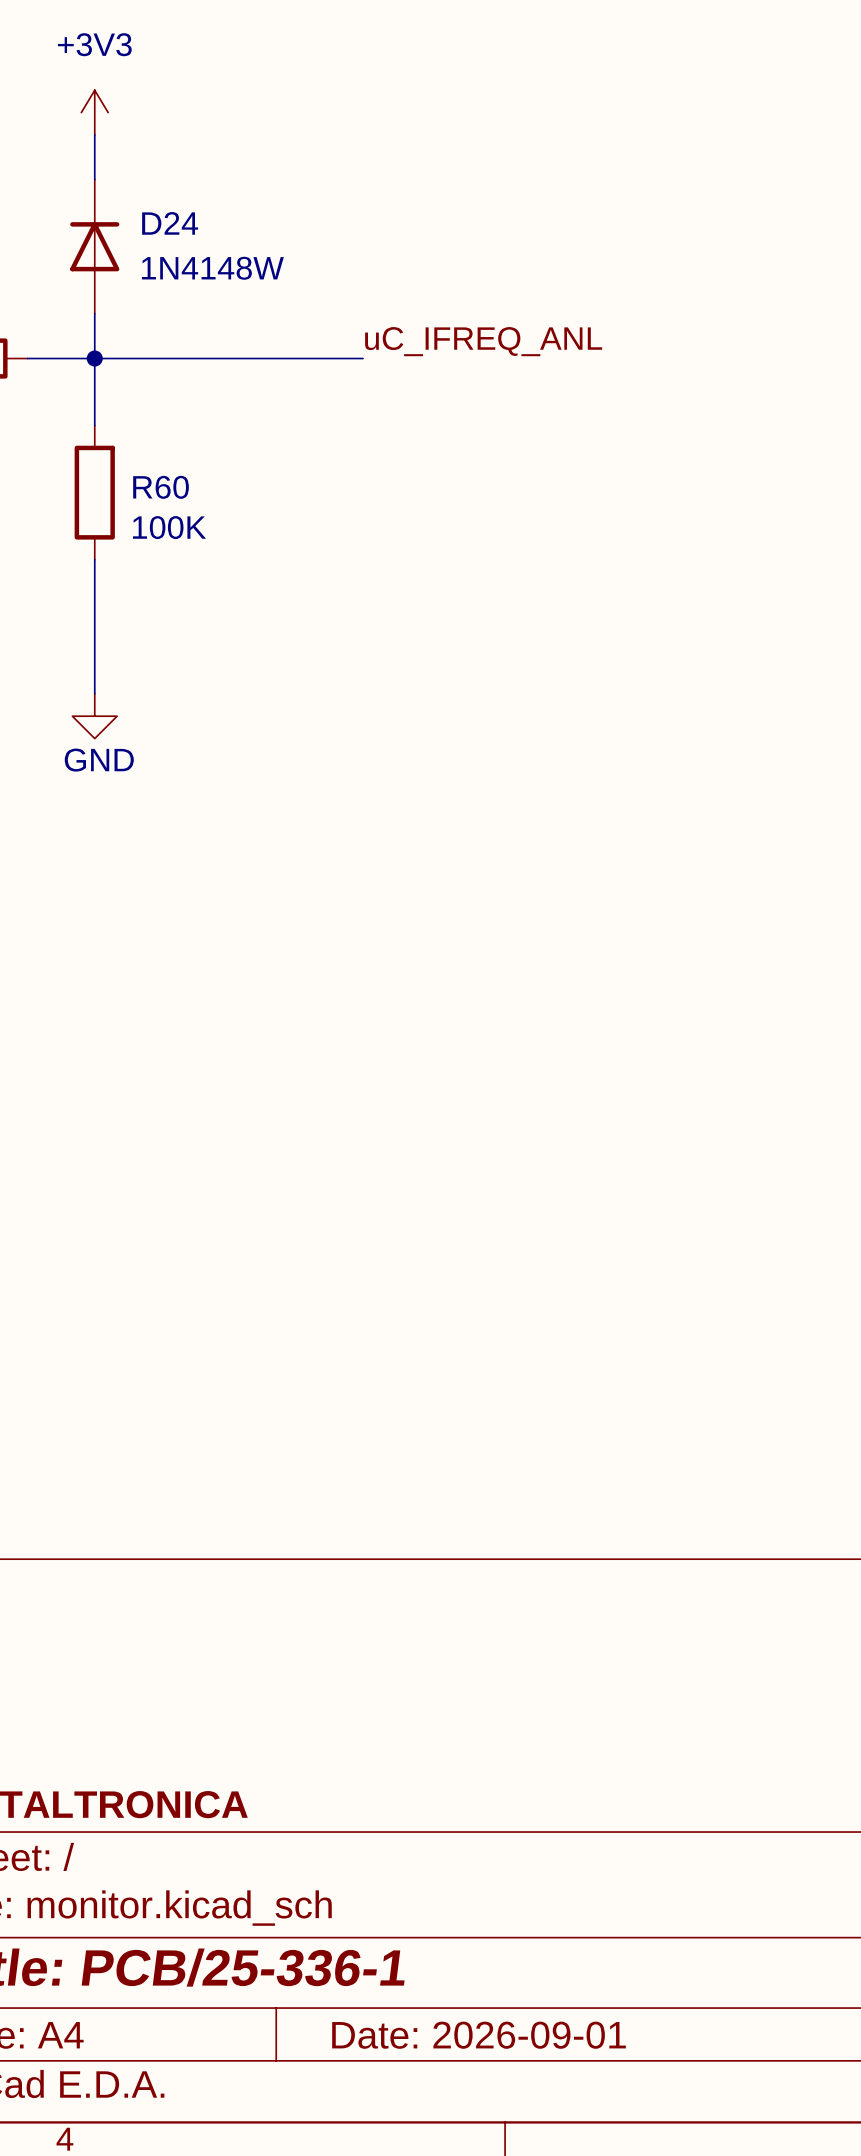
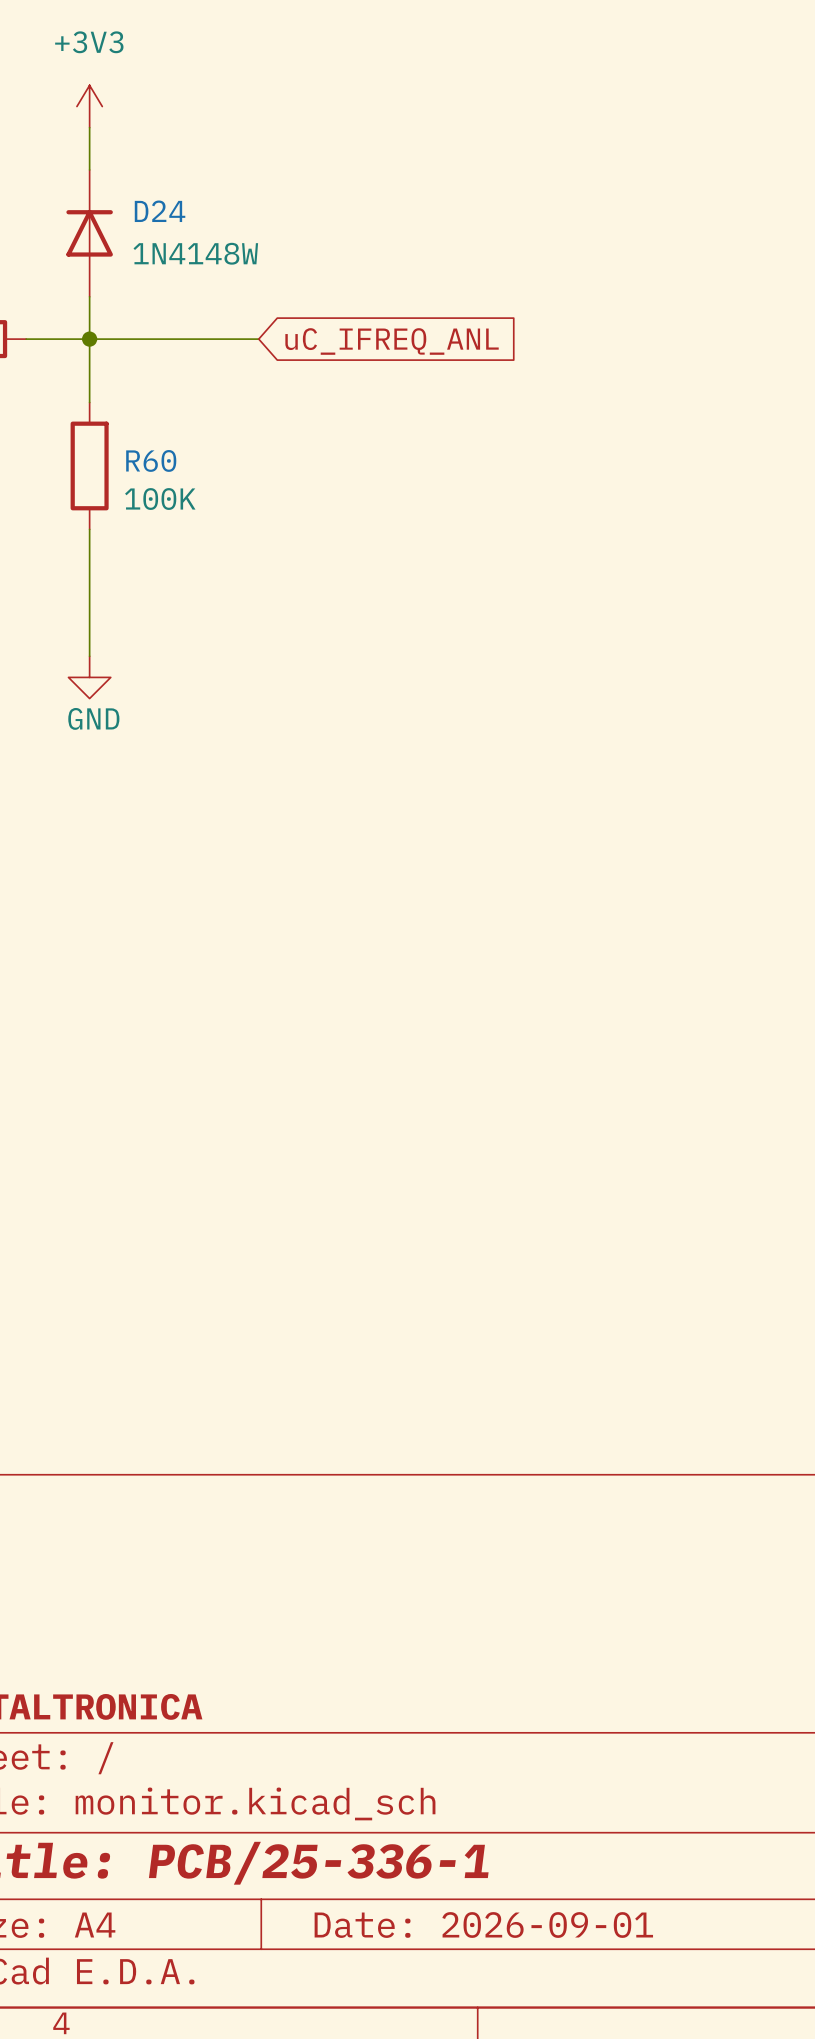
label: uC_IFREQ_ANL (483, 341) -> none
wire: (273, 358) (363, 358) -> none
global label: none -> uC_IFREQ_ANL (392, 341)

